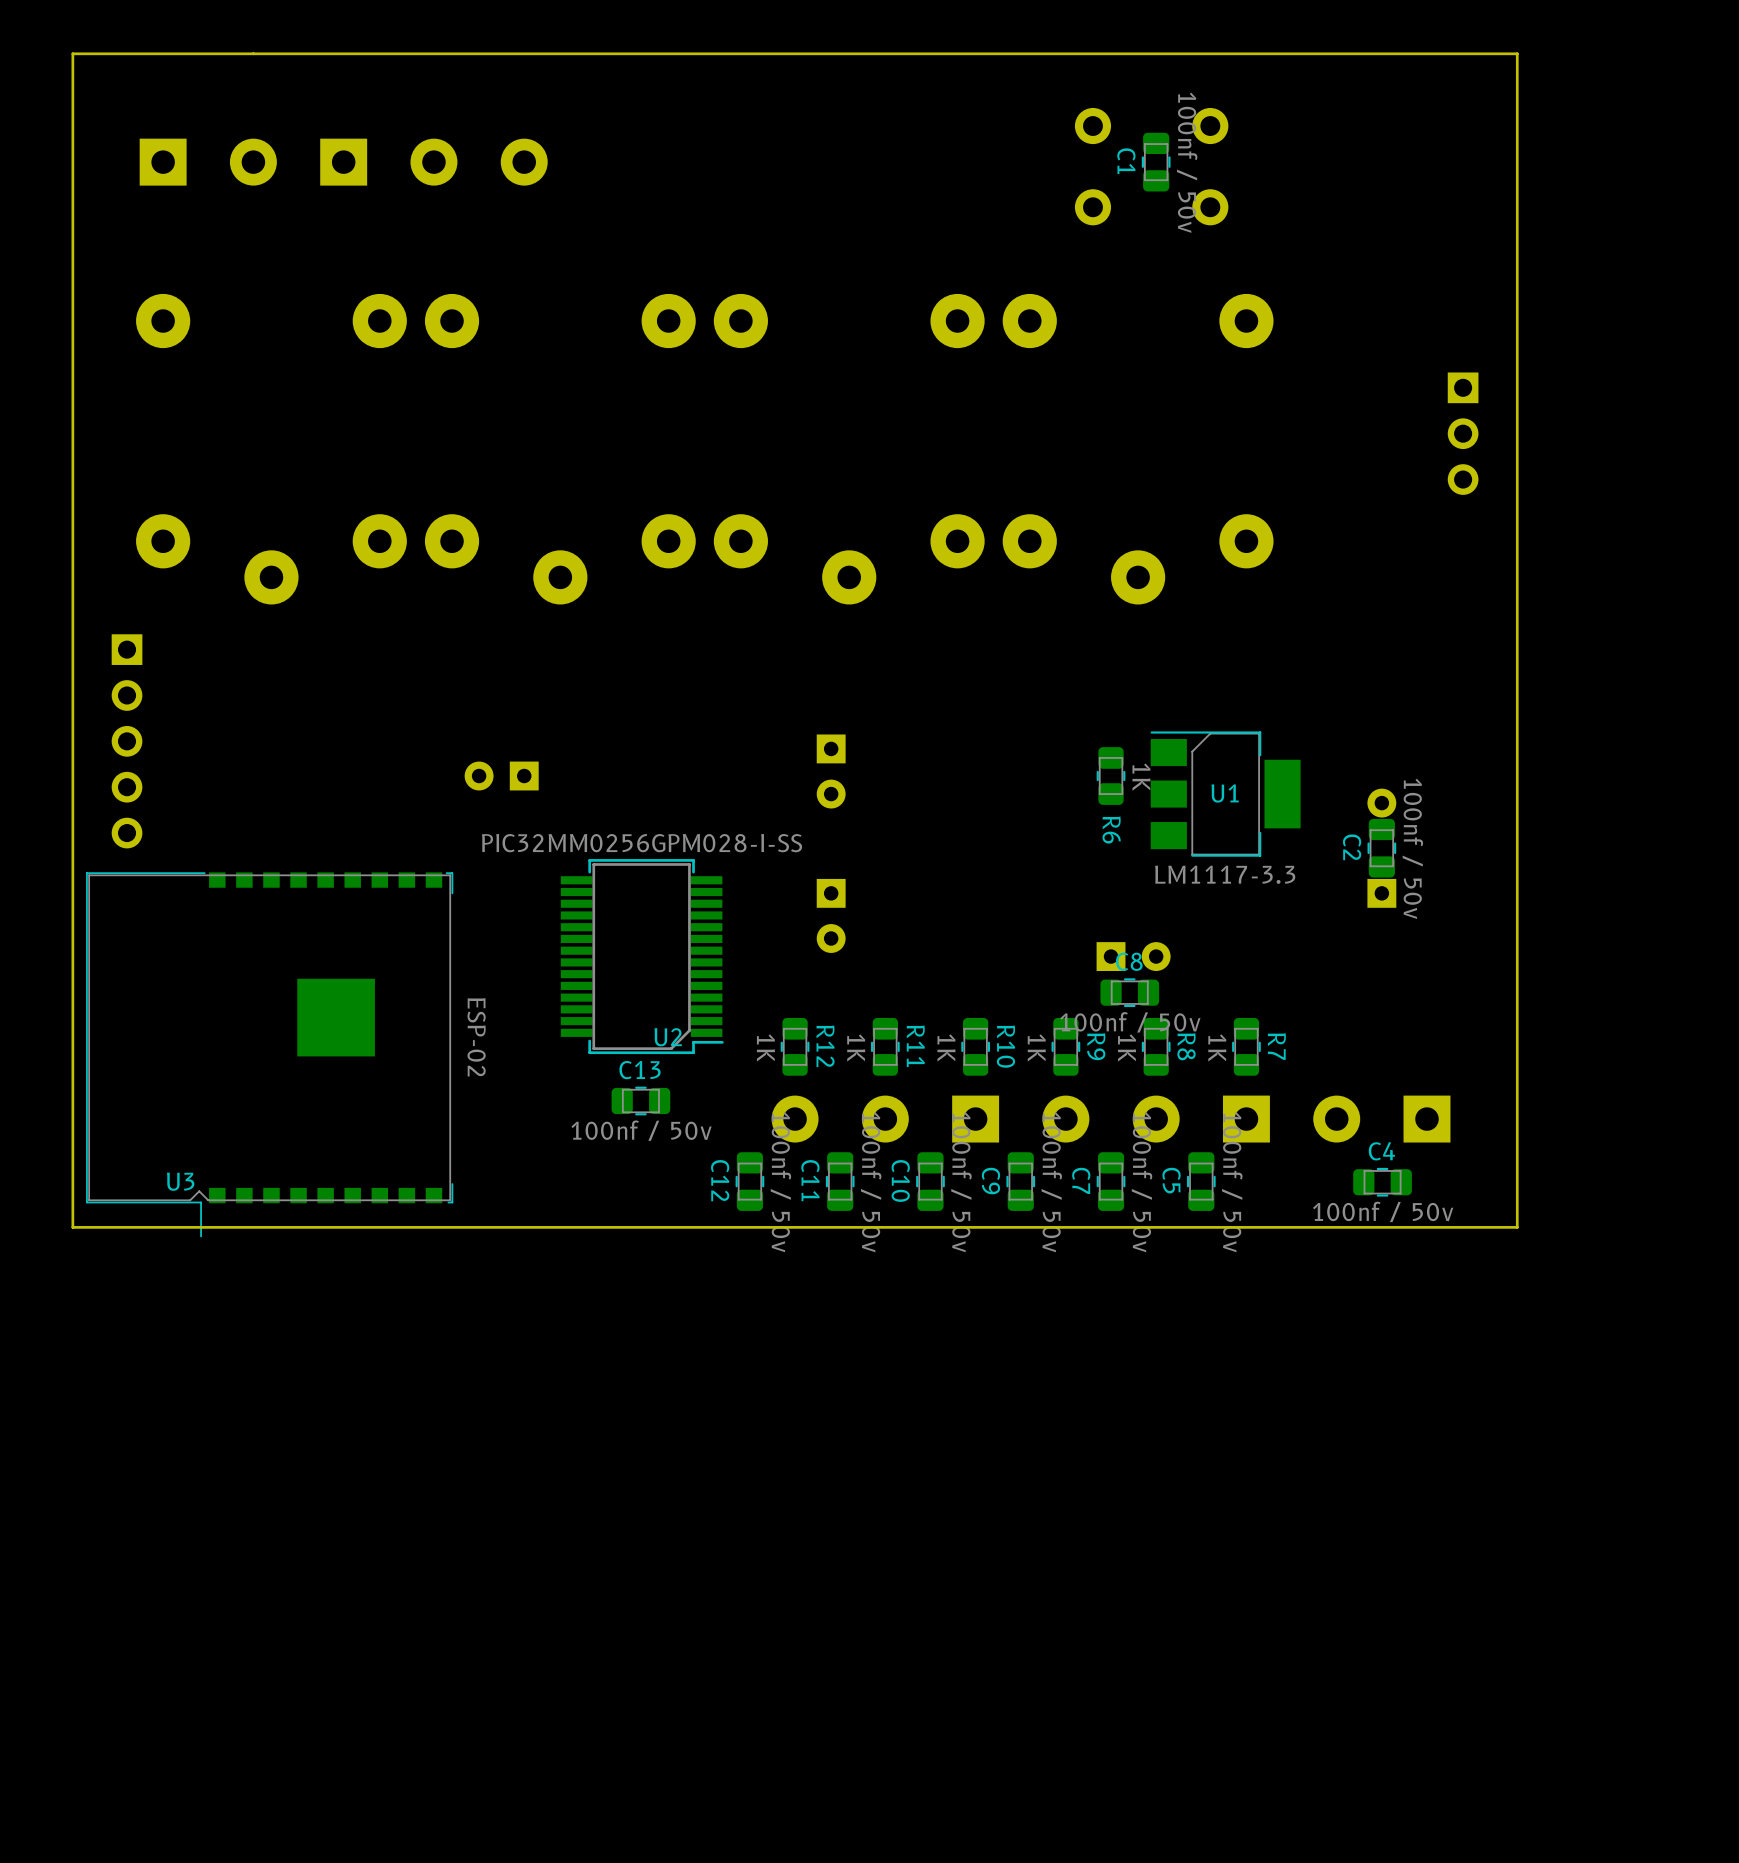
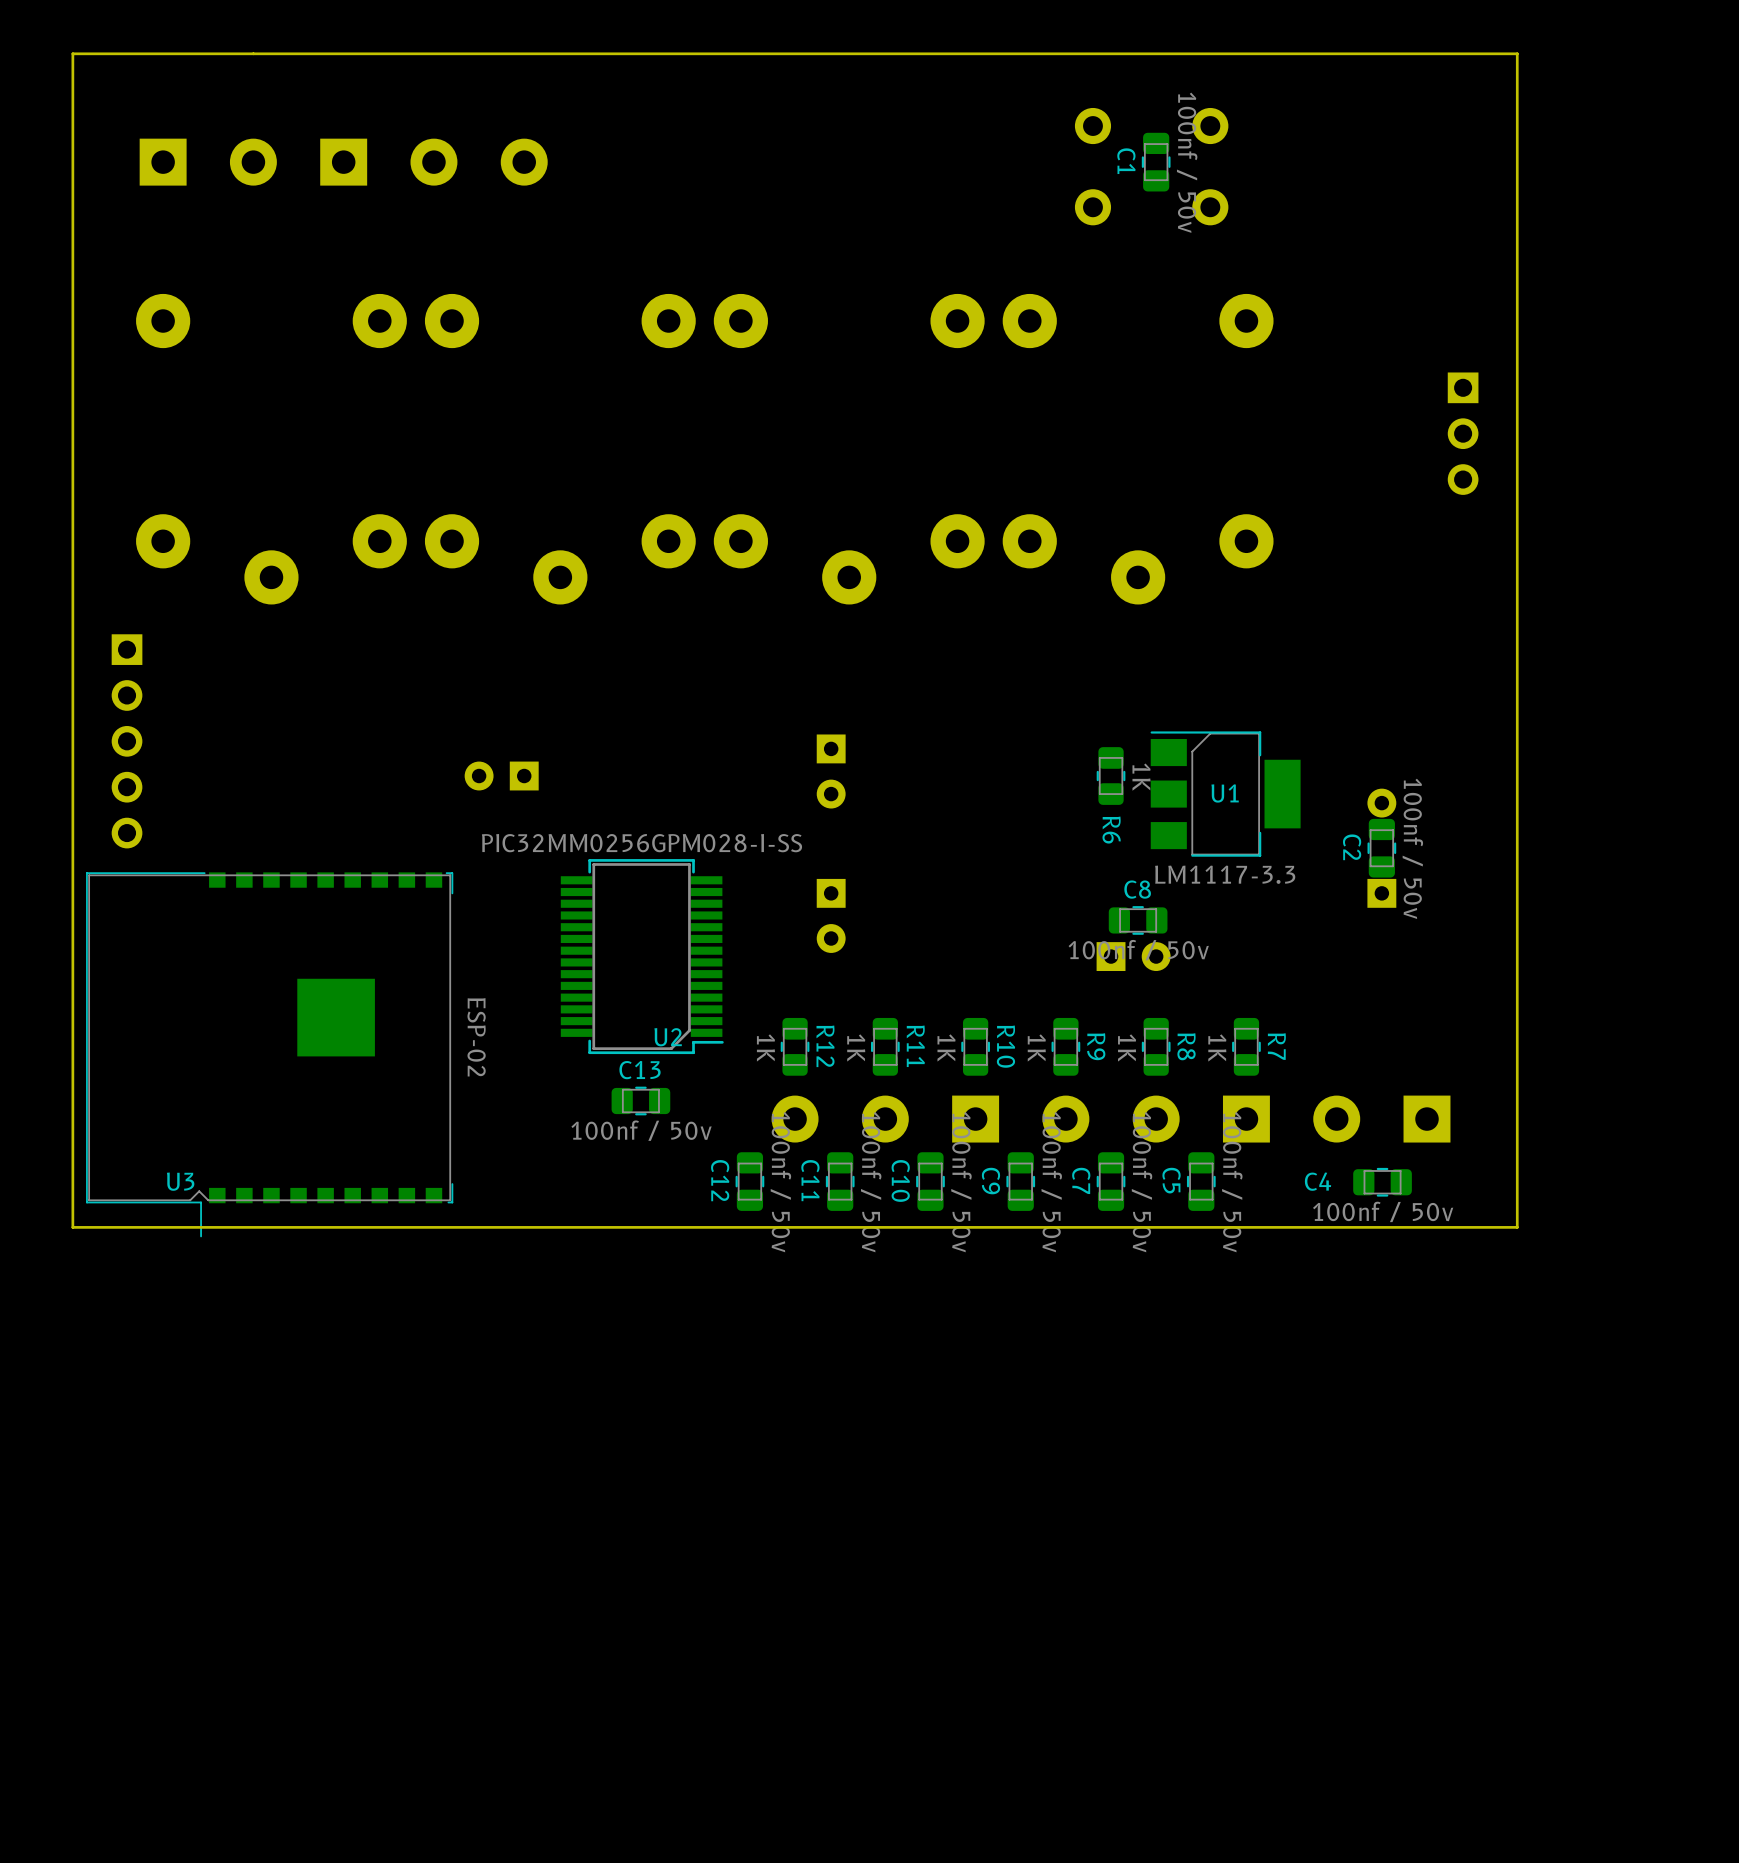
C8 position: (1129, 992) -> (1138, 920)
C4 name position: C4 (1381, 1151) -> C4 (1318, 1181)

